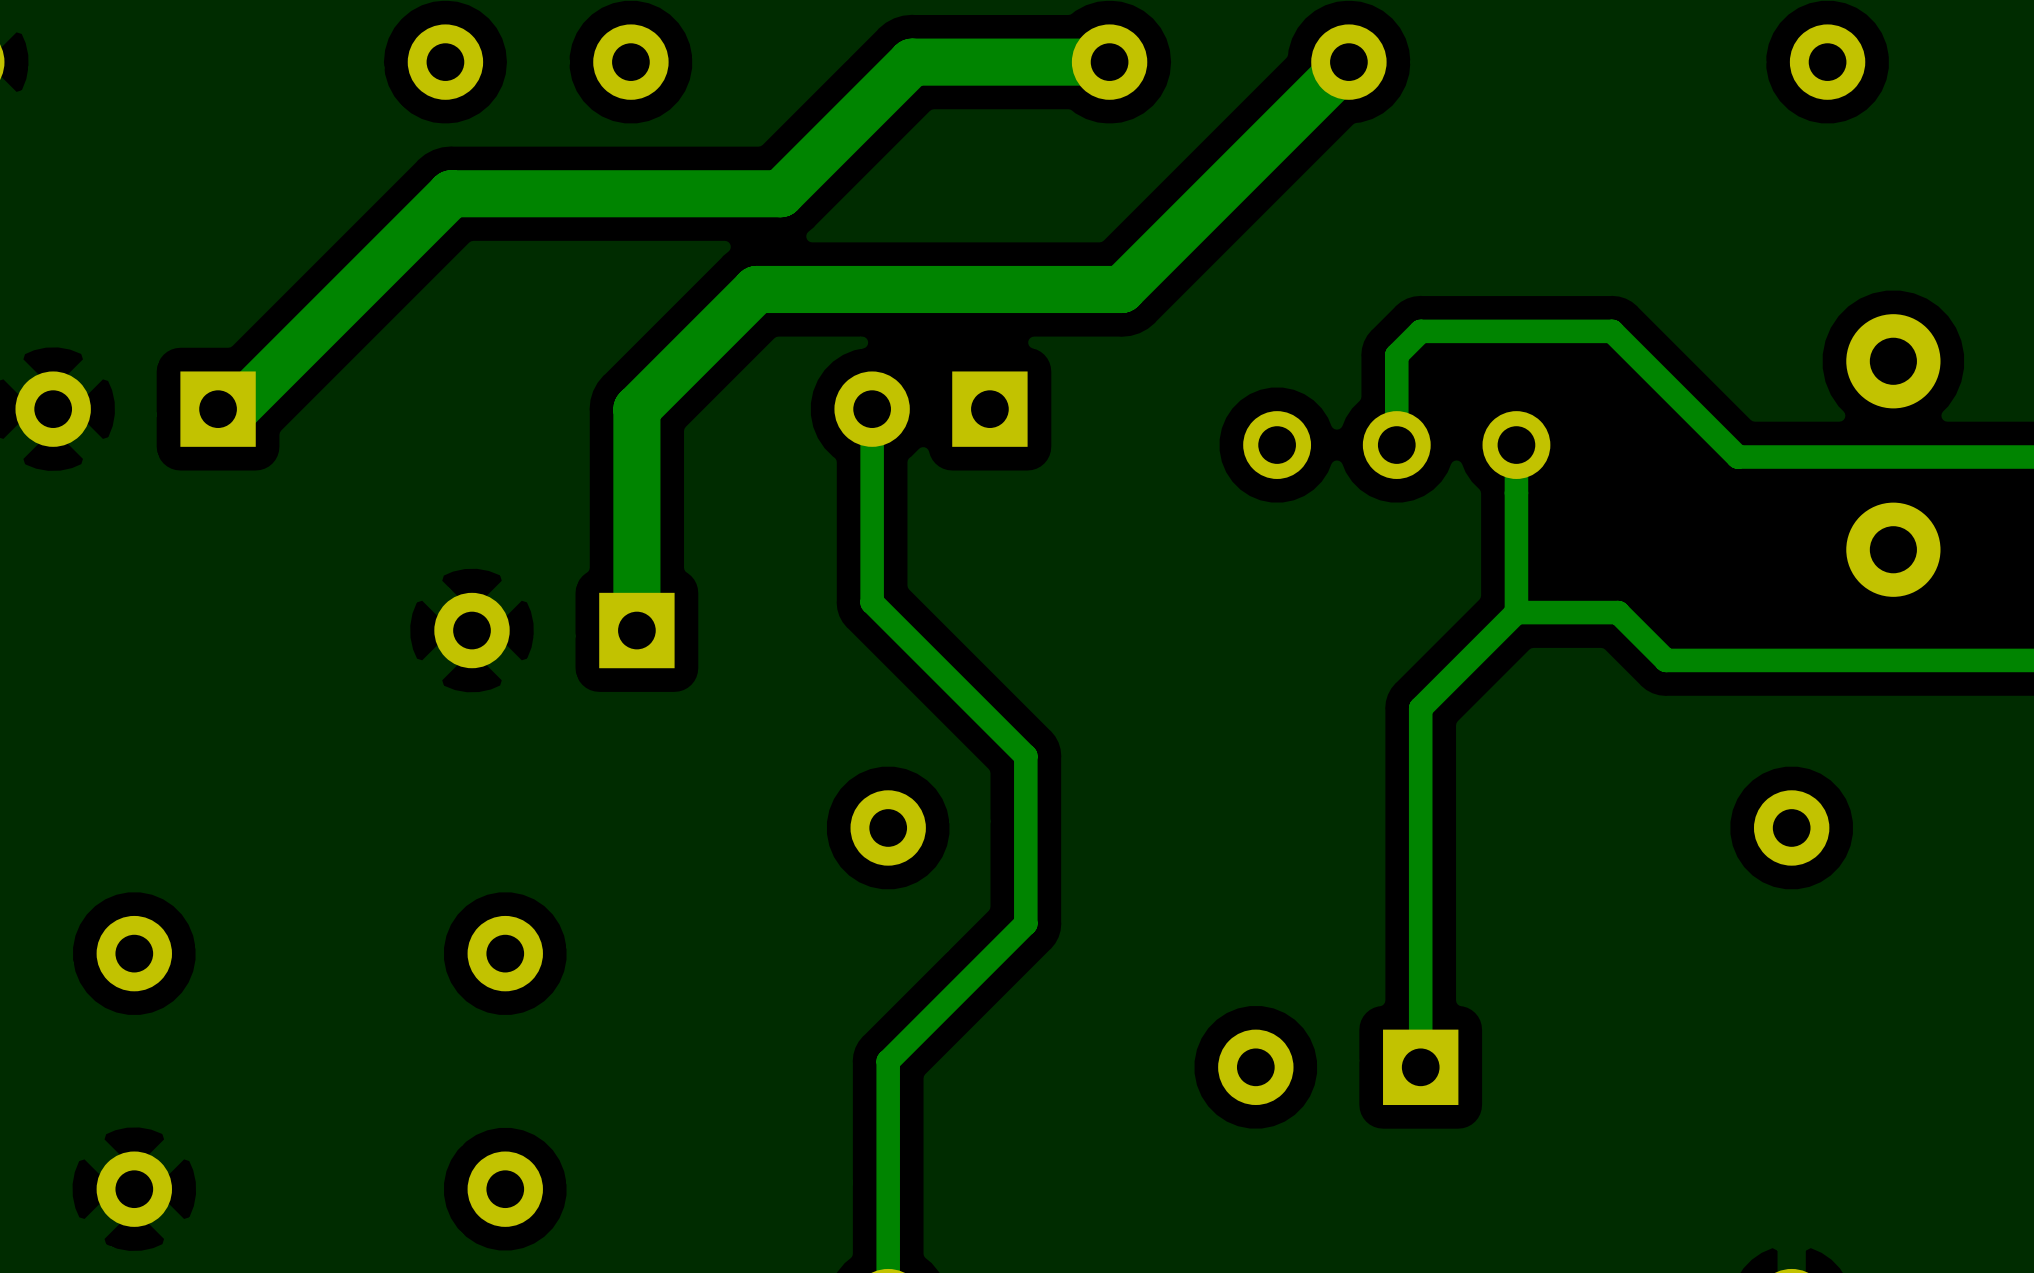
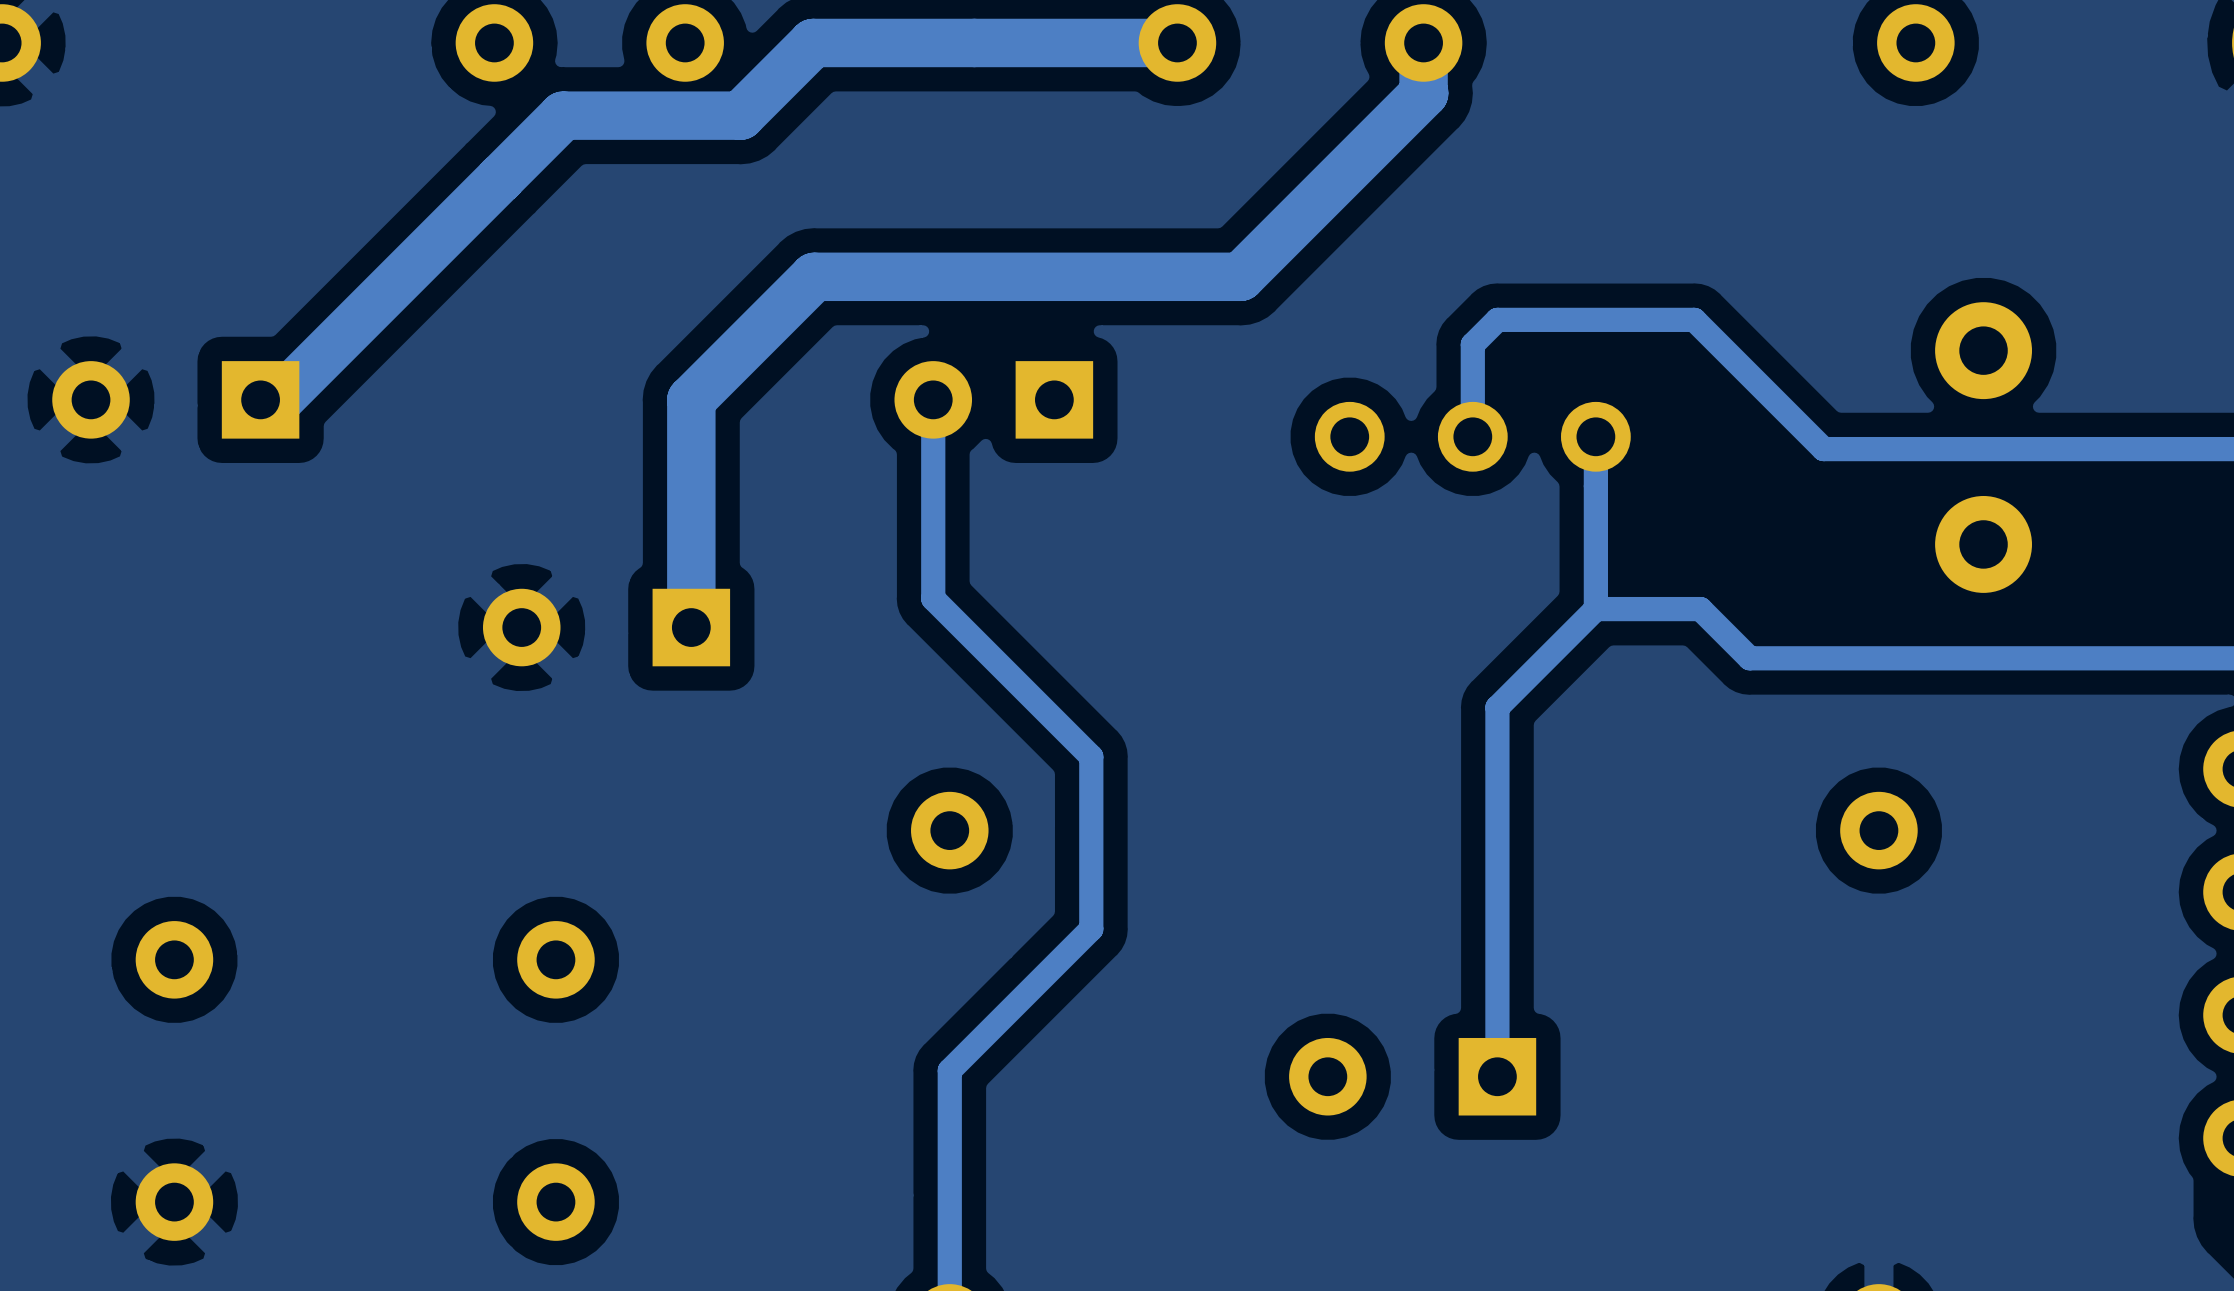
track: (912, 62) (780, 193) (451, 193) -> (974, 42) (813, 42) (740, 115) (563, 115) (500, 178)
track: (1348, 62) (1121, 289) -> (1424, 93) (1240, 276) (1189, 276)

